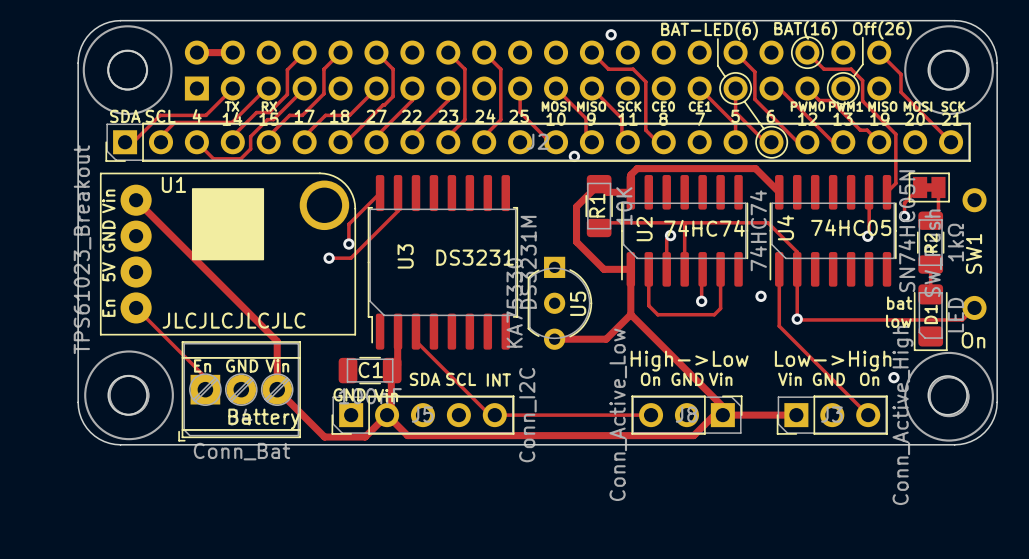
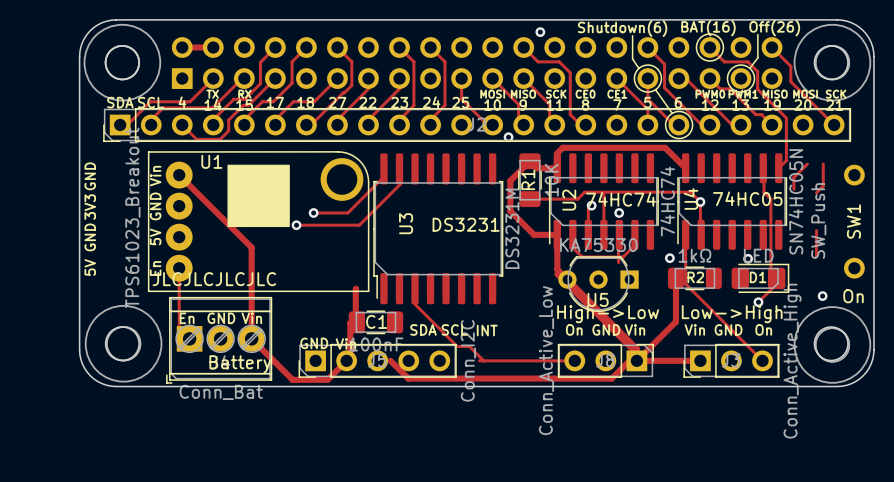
text: BAT-LED(6) (709, 30) -> Shutdown(6) (622, 28)
part: (929, 187) -> none
track: (869, 192) (867, 236) -> (763, 168) (763, 192) (770, 199) (770, 272) (776, 278) (776, 284) (758, 302)
track: (380, 193) (348, 224) (348, 244) -> (383, 168) (383, 176) (347, 212) (313, 212)
track: (398, 193) (398, 211) (350, 258) -> (400, 168) (400, 184) (359, 225) (315, 225)
track: (136, 200) (277, 341) -> (179, 175) (251, 247) (251, 297)
text: none -> GND (90, 176)
via: (904, 216) -> none
track: (599, 227) (604, 222) (768, 222) (797, 252) (798, 319) (962, 319) (974, 307) -> (529, 199) (577, 199) (584, 192) (690, 192) (700, 201) (701, 234)
via: none -> (700, 201)
via: (867, 236) -> none
text: none -> 3V3 (90, 207)
R2 rotation: 0° (930, 242) -> 90° clockwise (694, 278)
R2 position: (930, 242) -> (694, 278)
R2 value position: 1kΩ (955, 242) -> 1kΩ (694, 255)
U1 position: (228, 254) -> (258, 221)
text position: DS3231 (475, 257) -> DS3231 (466, 224)
U3 position: (442, 262) -> (438, 228)
text: none -> GND (90, 237)
track: (720, 281) (720, 308) (714, 314) (657, 314) (648, 305) (648, 284) -> (634, 245) (623, 256) (582, 256) (572, 247)
via: none -> (748, 258)
via position: (701, 301) -> (619, 212)
U5 rotation: 0° (559, 303) -> 90° clockwise (598, 284)
U5 position: (559, 303) -> (598, 284)
text: bat (899, 303) -> none
text: none -> 5V (90, 267)
track: (136, 307) (205, 377) (205, 389) -> (179, 268) (179, 328) (189, 338)
track: (630, 309) (630, 314) (606, 339) (554, 339) -> (557, 269) (636, 349) (636, 360) (675, 321) (675, 278)
D1 rotation: 0° (930, 317) -> 90° counterclockwise (760, 278)
D1 position: (930, 317) -> (760, 278)
via: (797, 319) -> none
text: low (898, 321) -> none
track: (415, 331) (415, 341) (489, 415) (540, 415) -> none
track: none -> (415, 288) (415, 304) (457, 346) (469, 346) (483, 360)
via: none -> (822, 296)
via: none -> (758, 302)
C1 position: (370, 370) -> (375, 322)
via: (893, 377) -> none
text position: SDA (425, 379) -> SDA (423, 329)
text position: SCL (461, 379) -> SCL (454, 329)
text position: INT (498, 380) -> INT (487, 330)
track: (387, 415) (407, 435) (458, 435) -> (390, 360) (408, 378)

